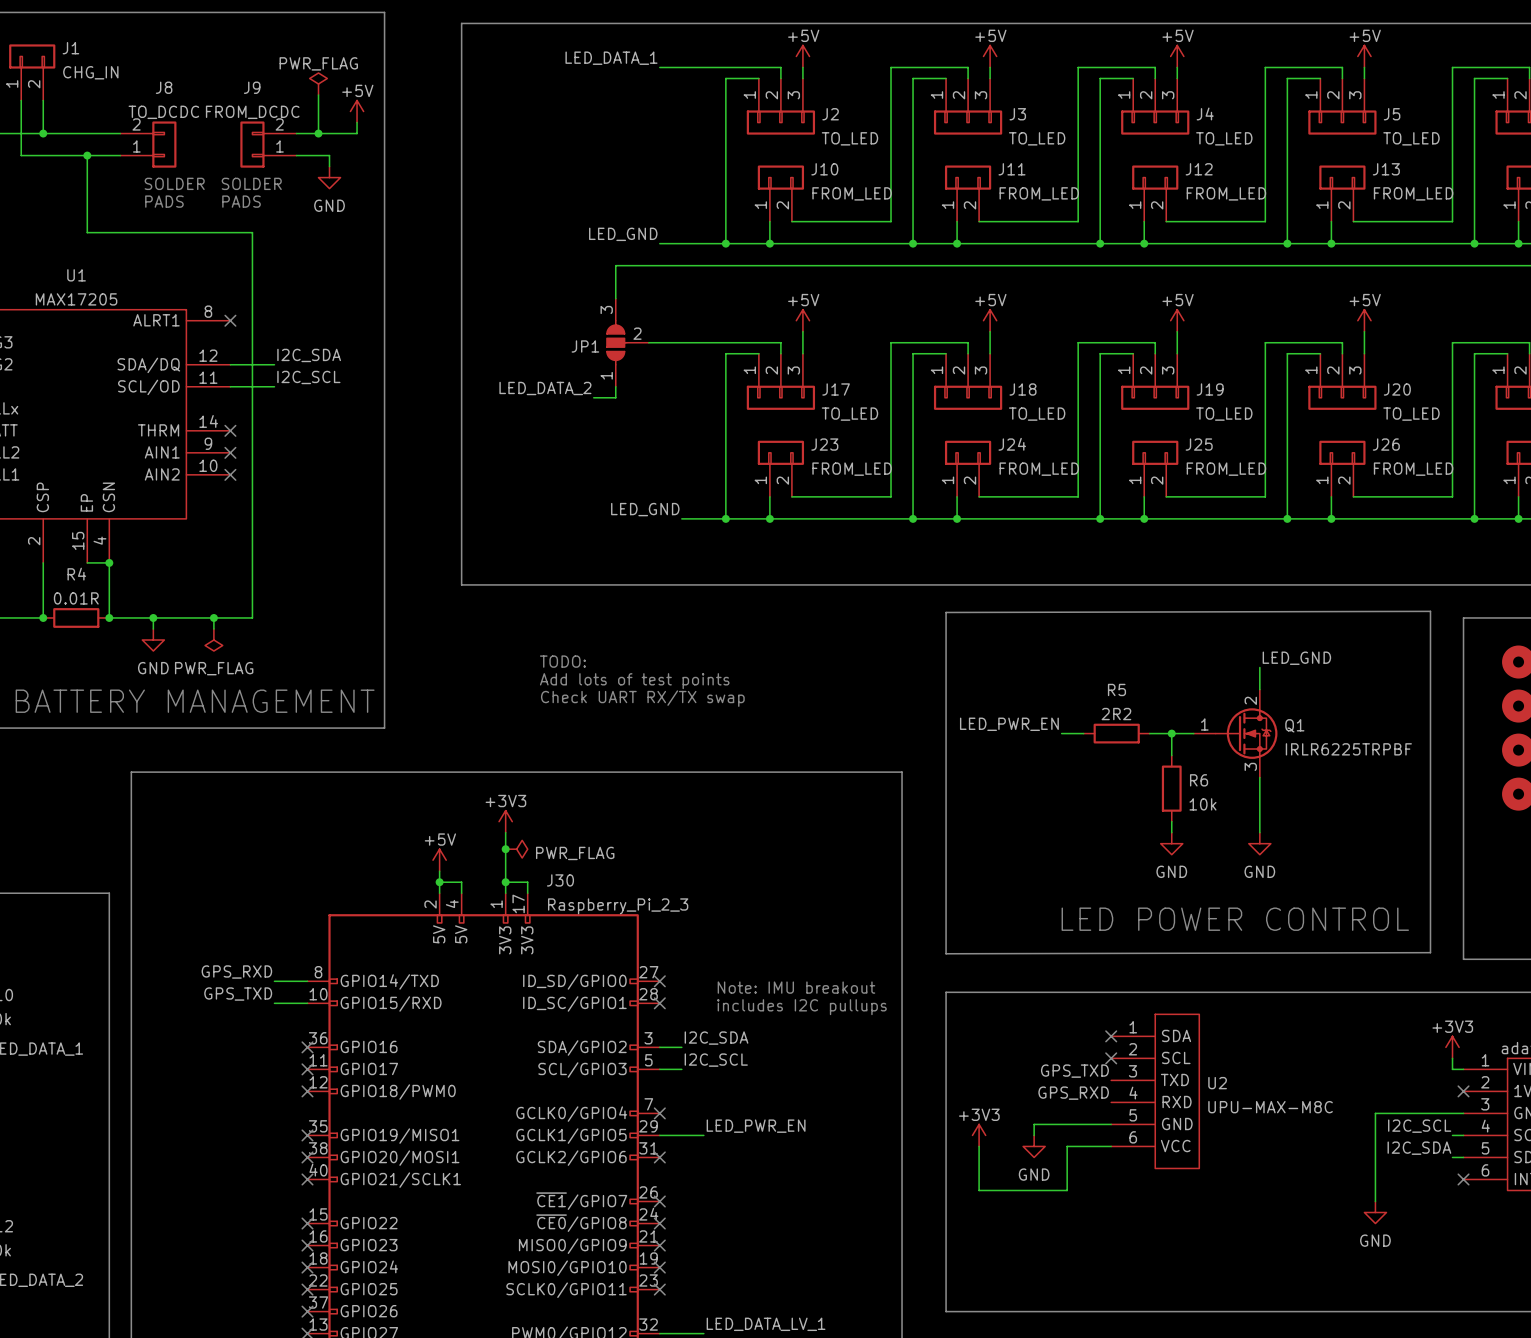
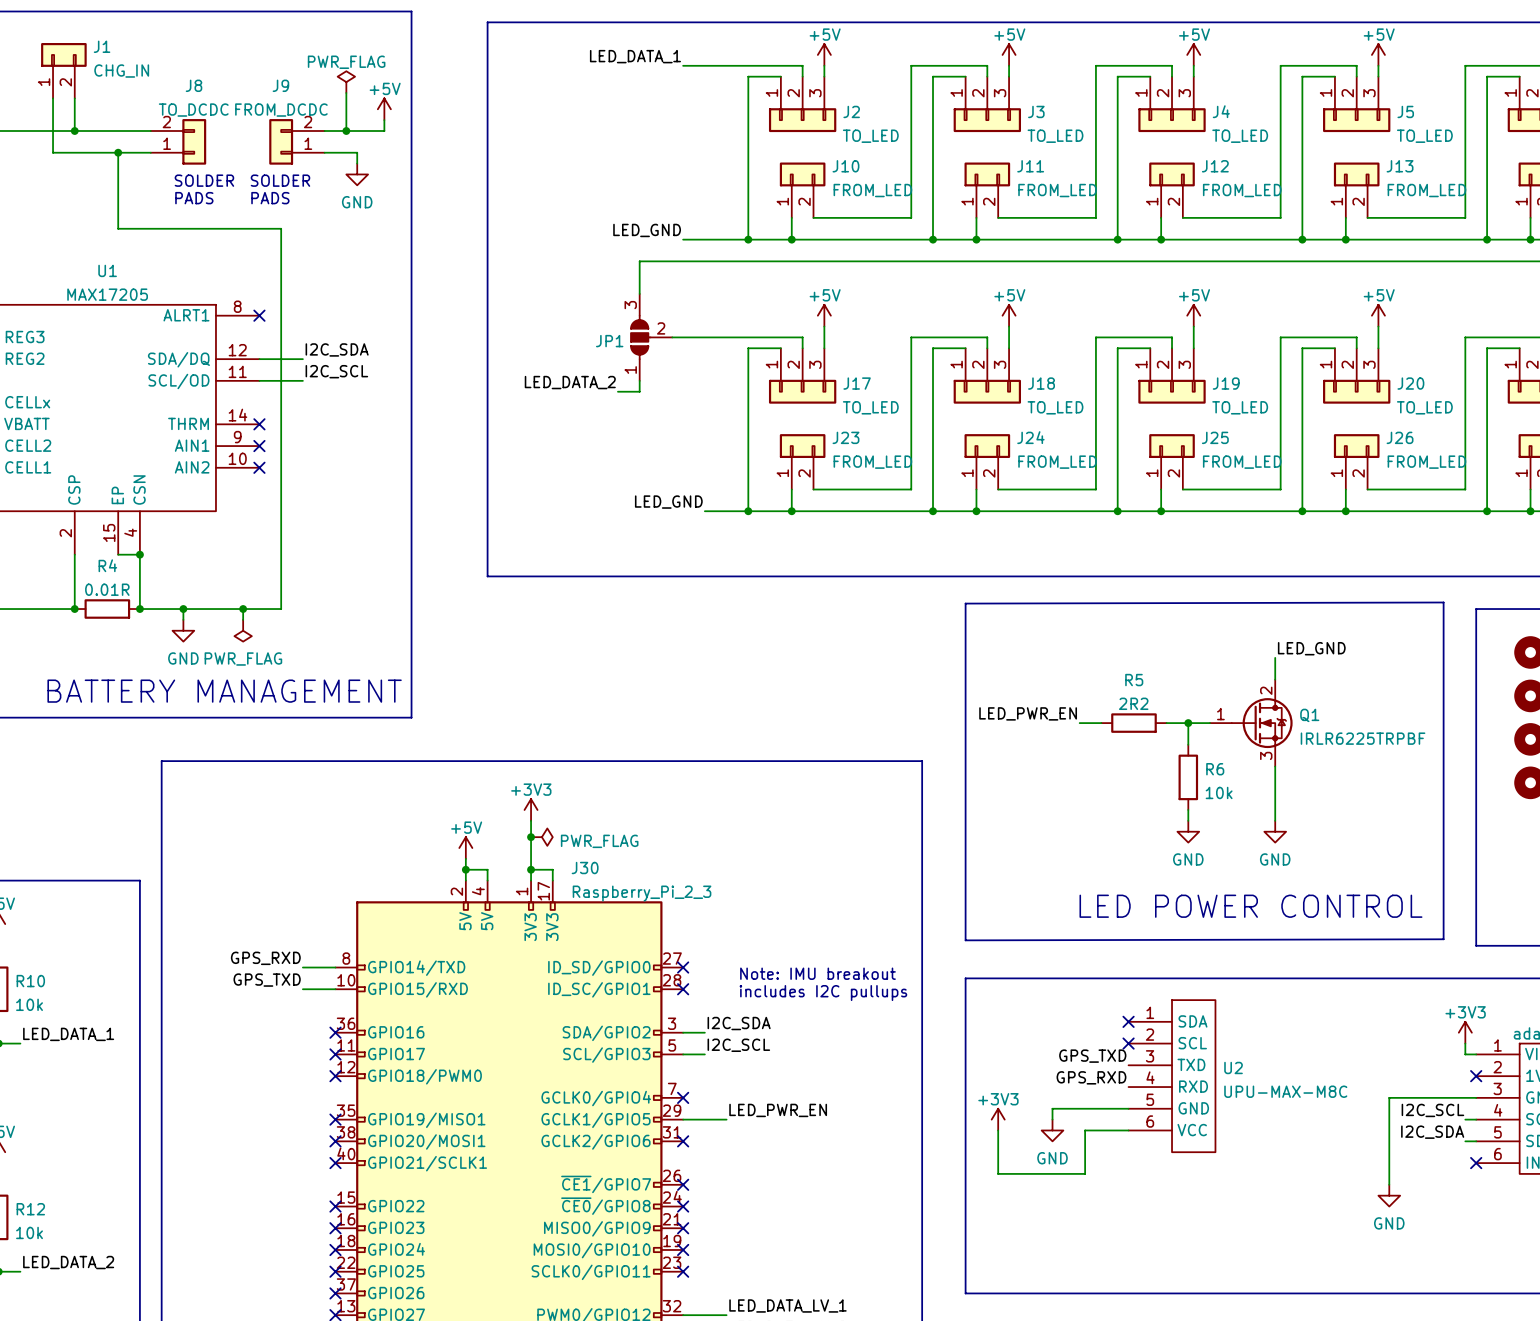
text: TODO: (562, 661) -> none
text: Add lots of test points (634, 681) -> none
text: Check UART RX/TX swap (642, 698) -> none

